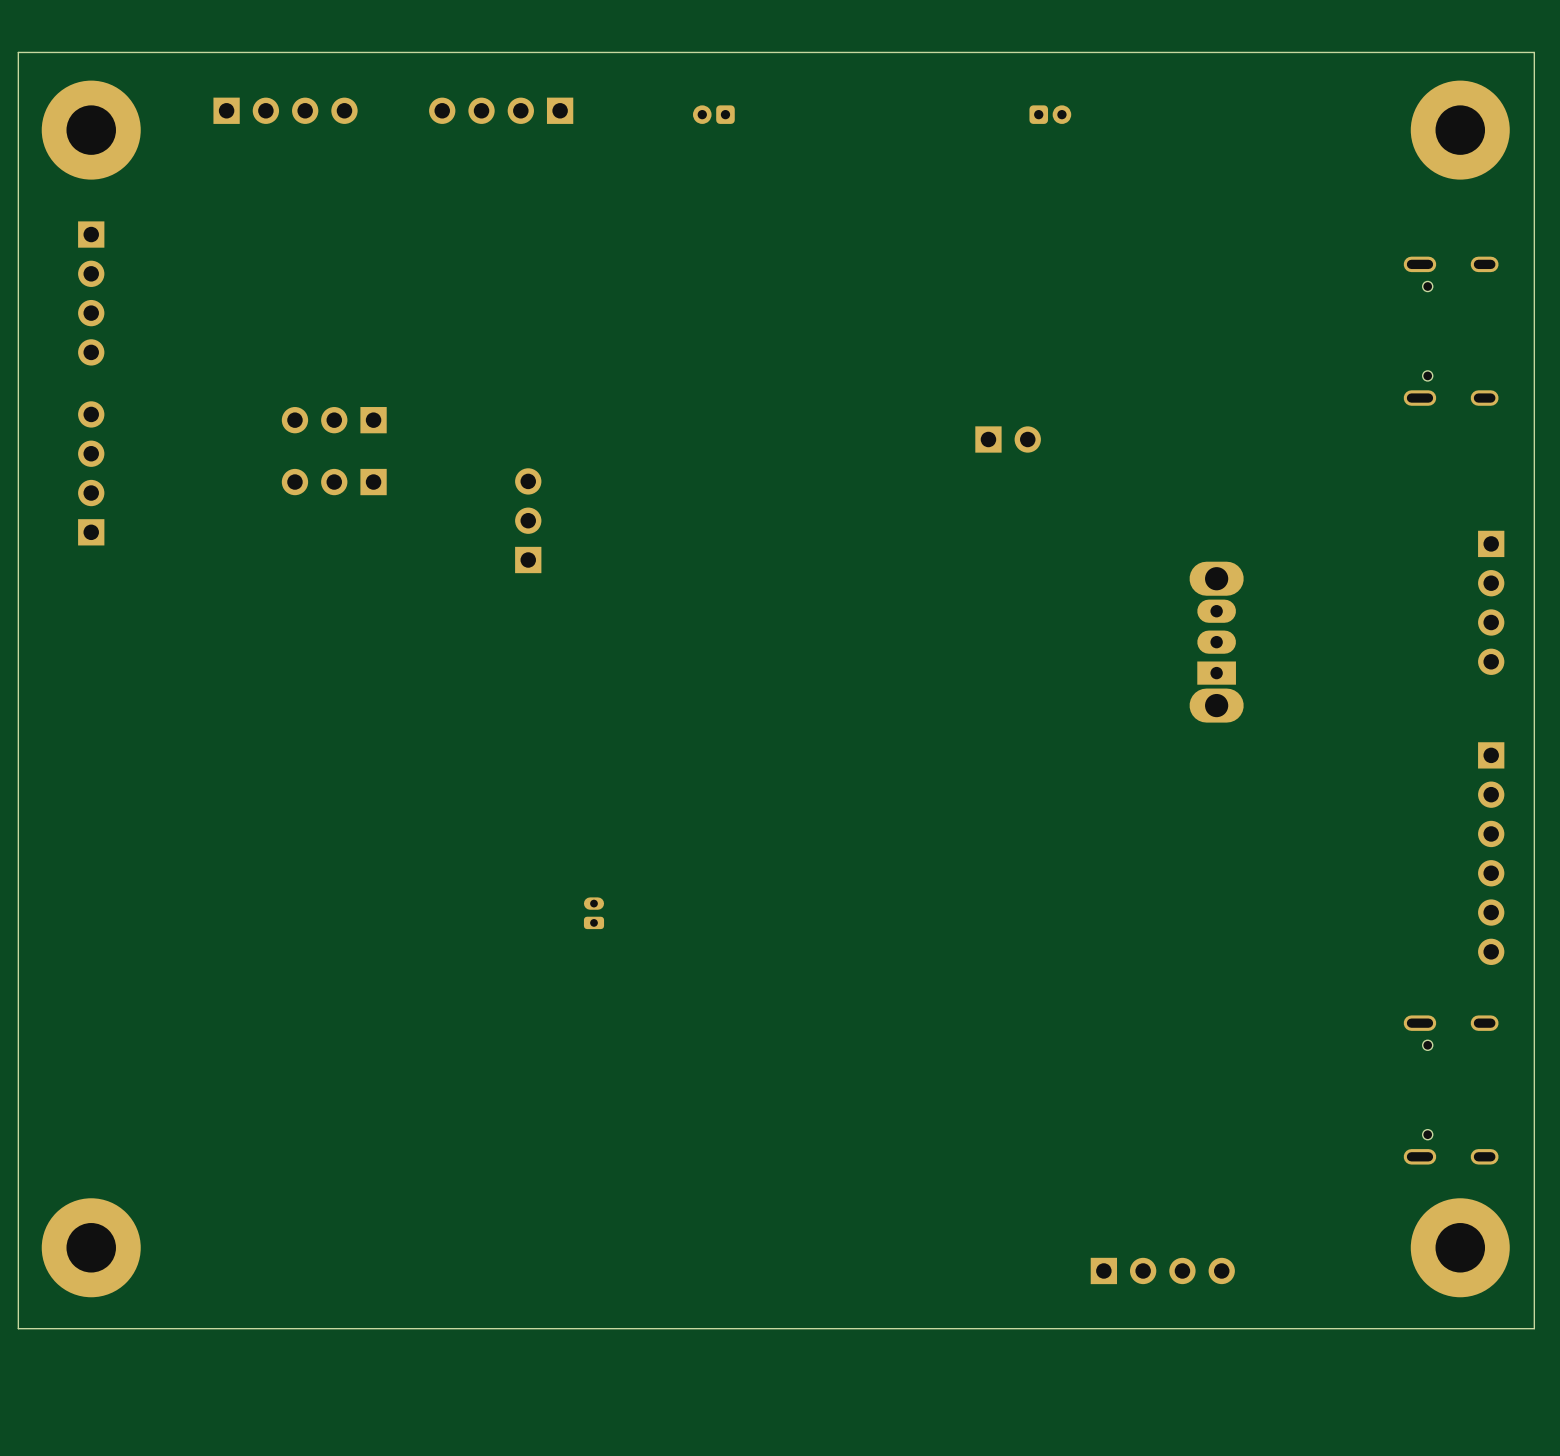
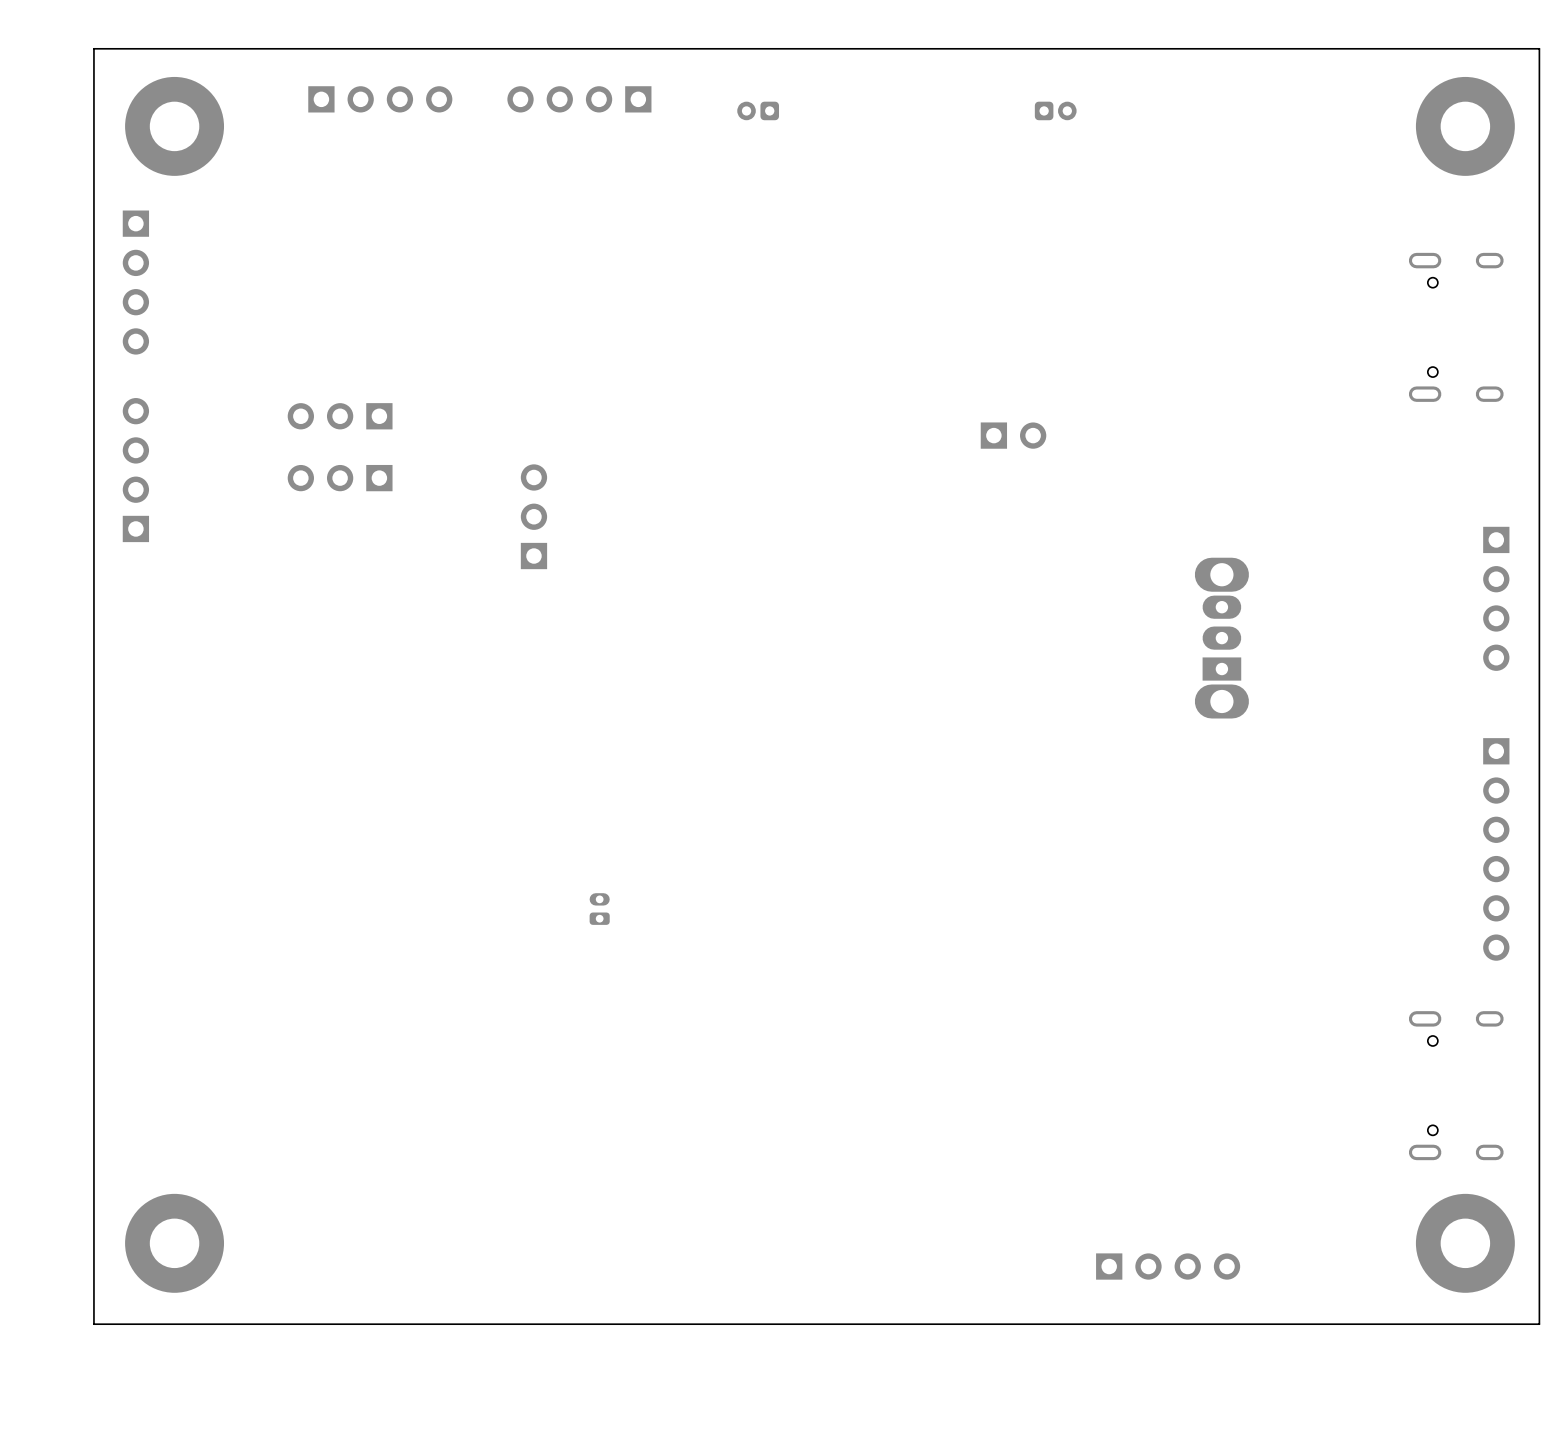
board edge: (87, 52) (18, 52) (18, 1328) (87, 1328) -> (93, 48) (93, 1324)
part: none -> (380, 99)
part: none -> (579, 99)
part: (285, 110) -> none
part: (501, 110) -> none
part position: (713, 114) -> (758, 110)
part position: (91, 130) -> (174, 126)
part position: (91, 293) -> (135, 282)
part position: (91, 473) -> (135, 470)
part position: (91, 1247) -> (174, 1243)

